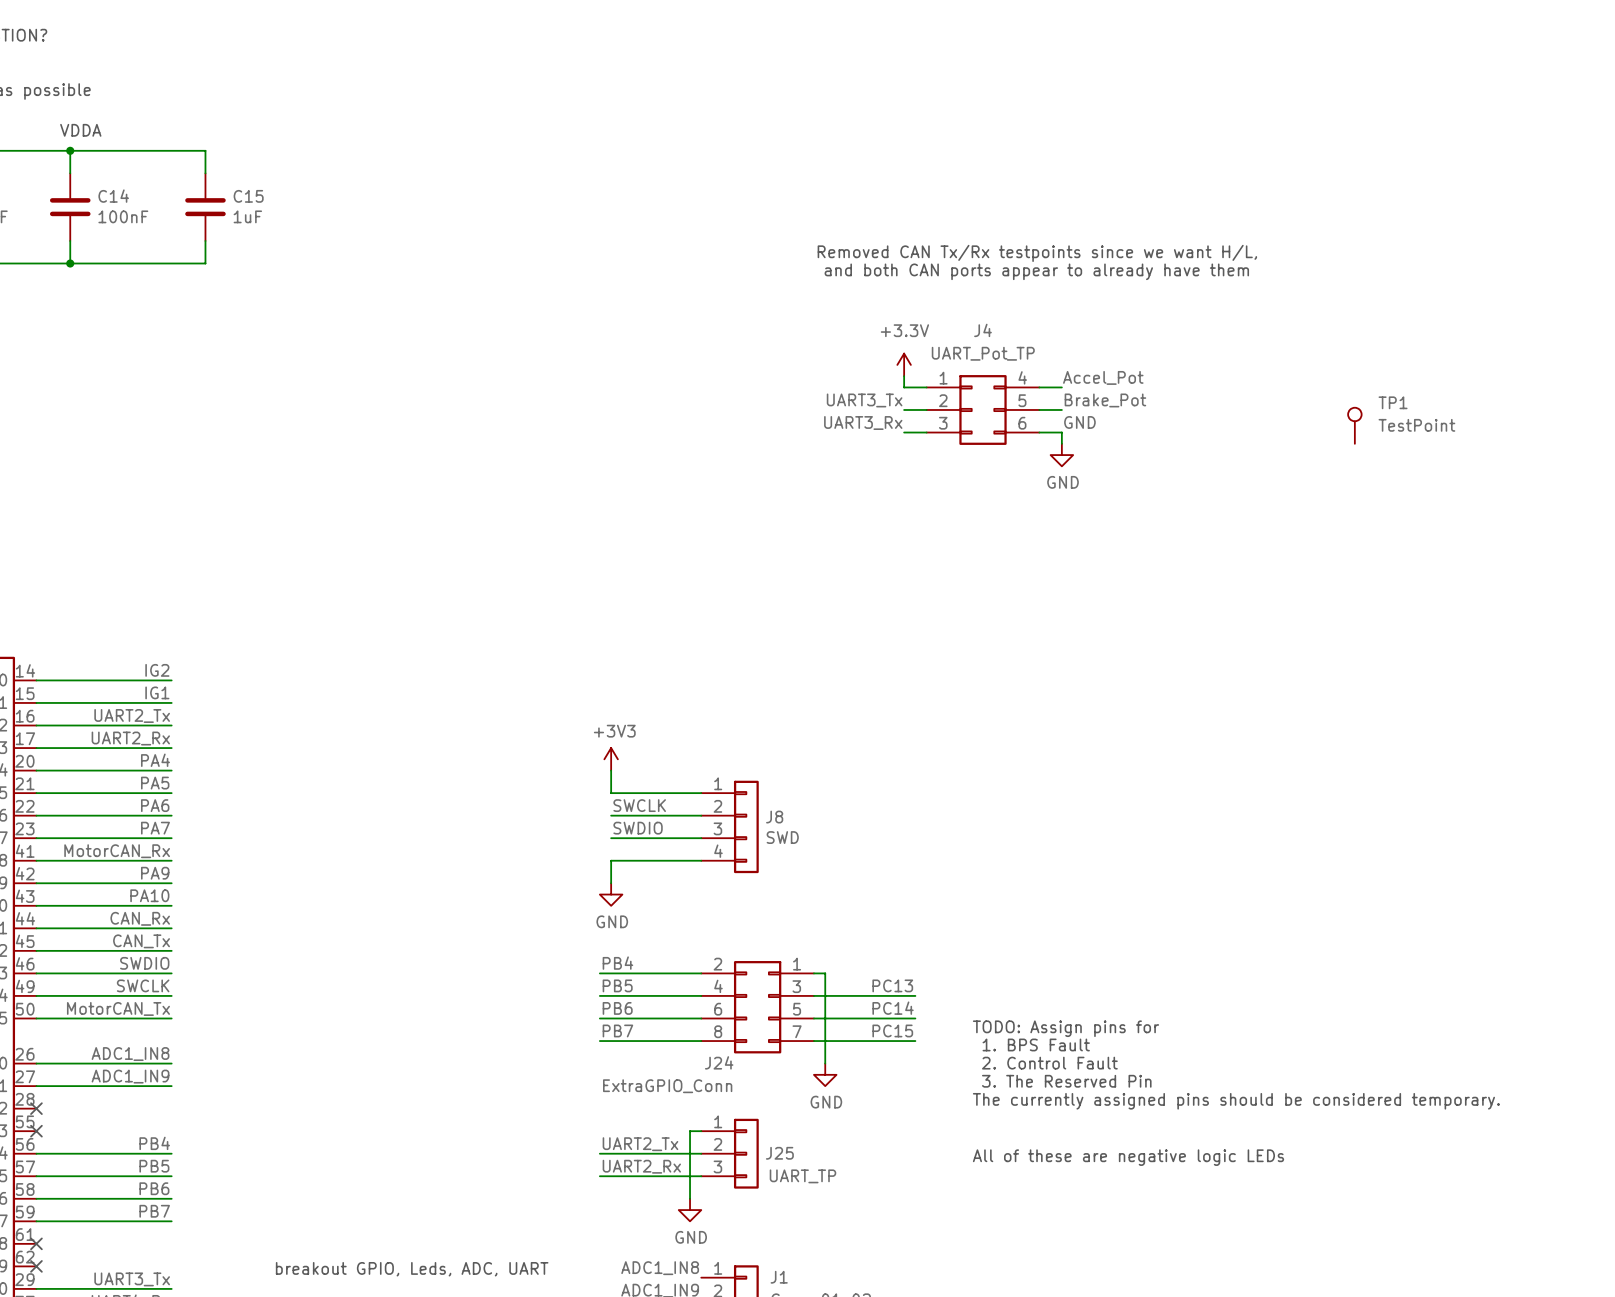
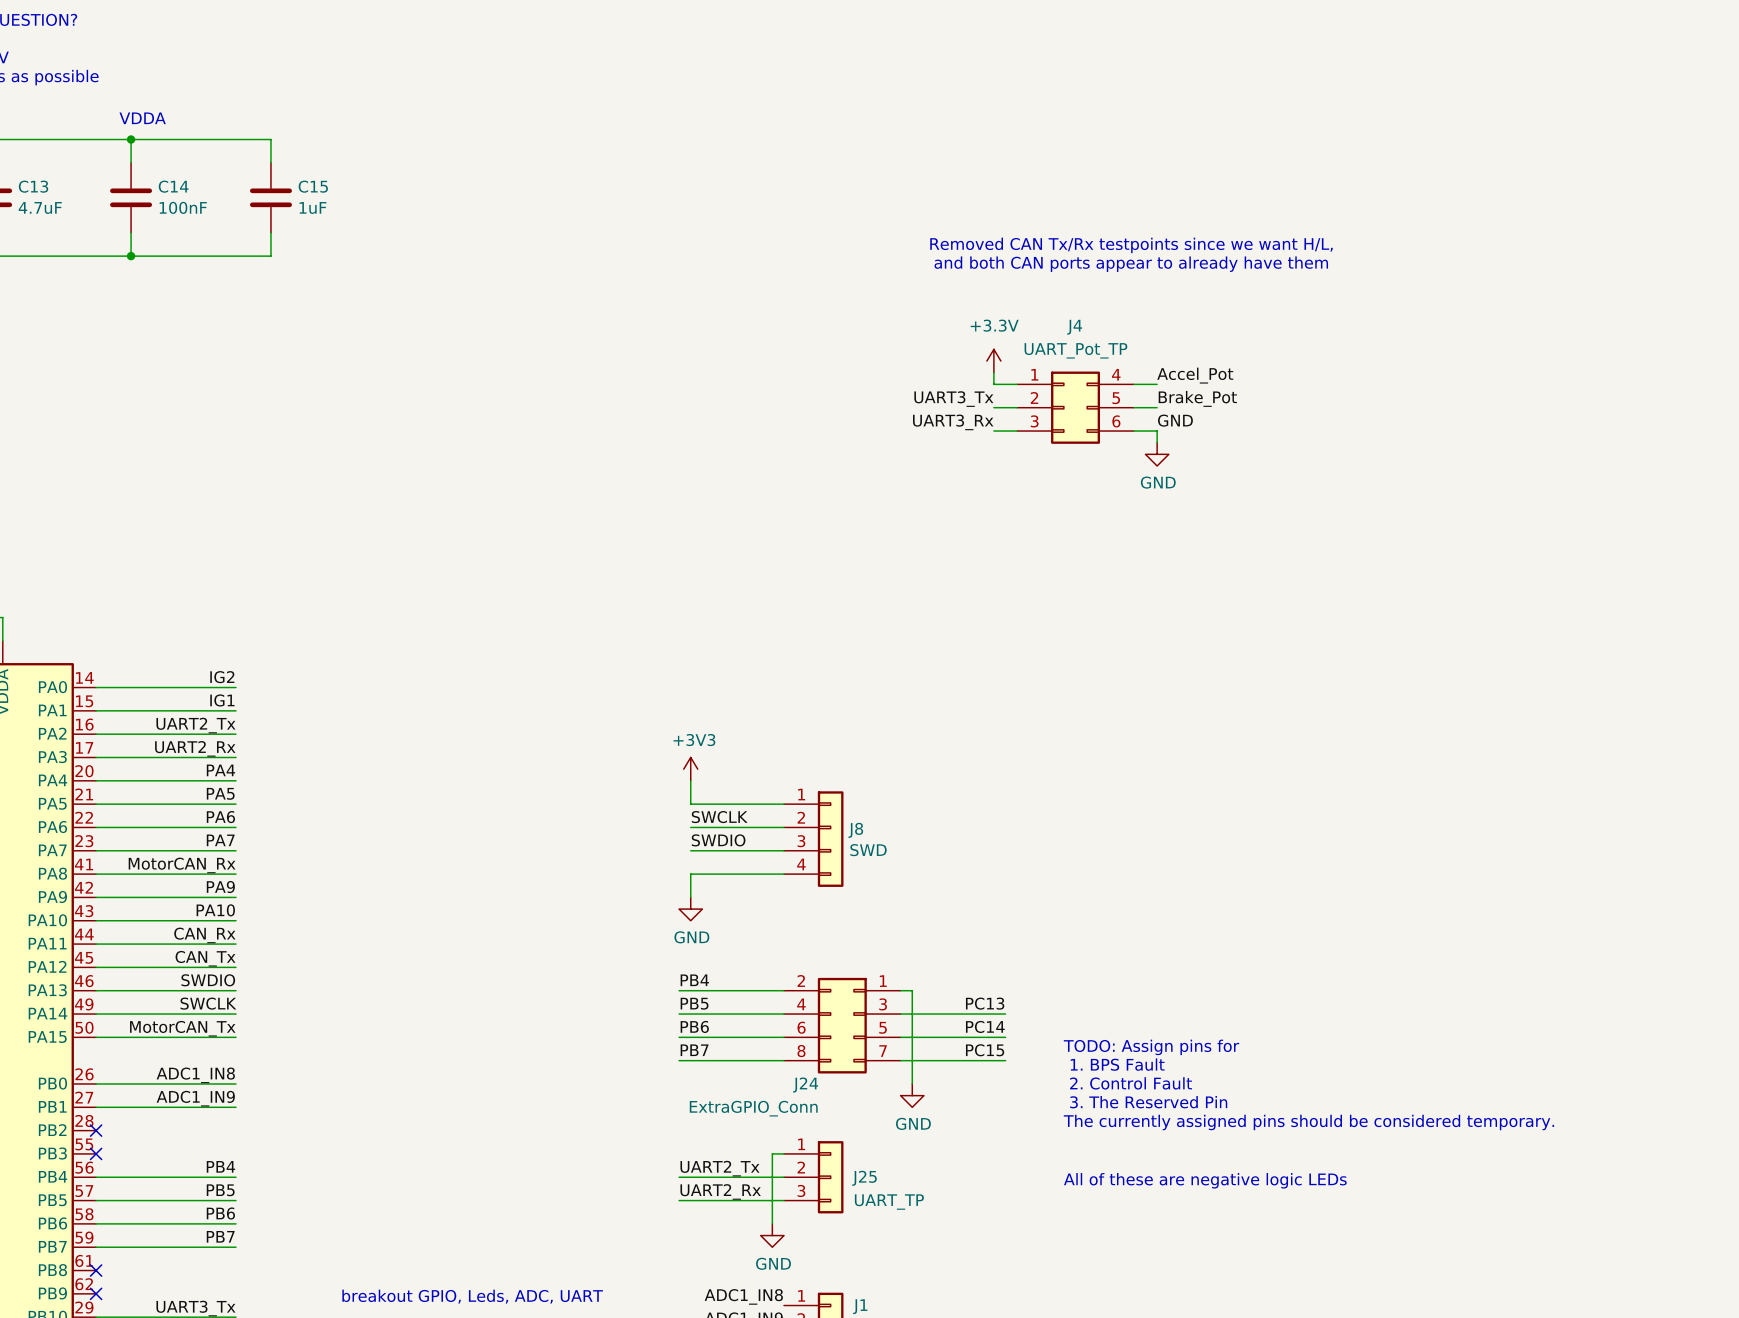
TP1: TestPoint (1354, 425) -> none

